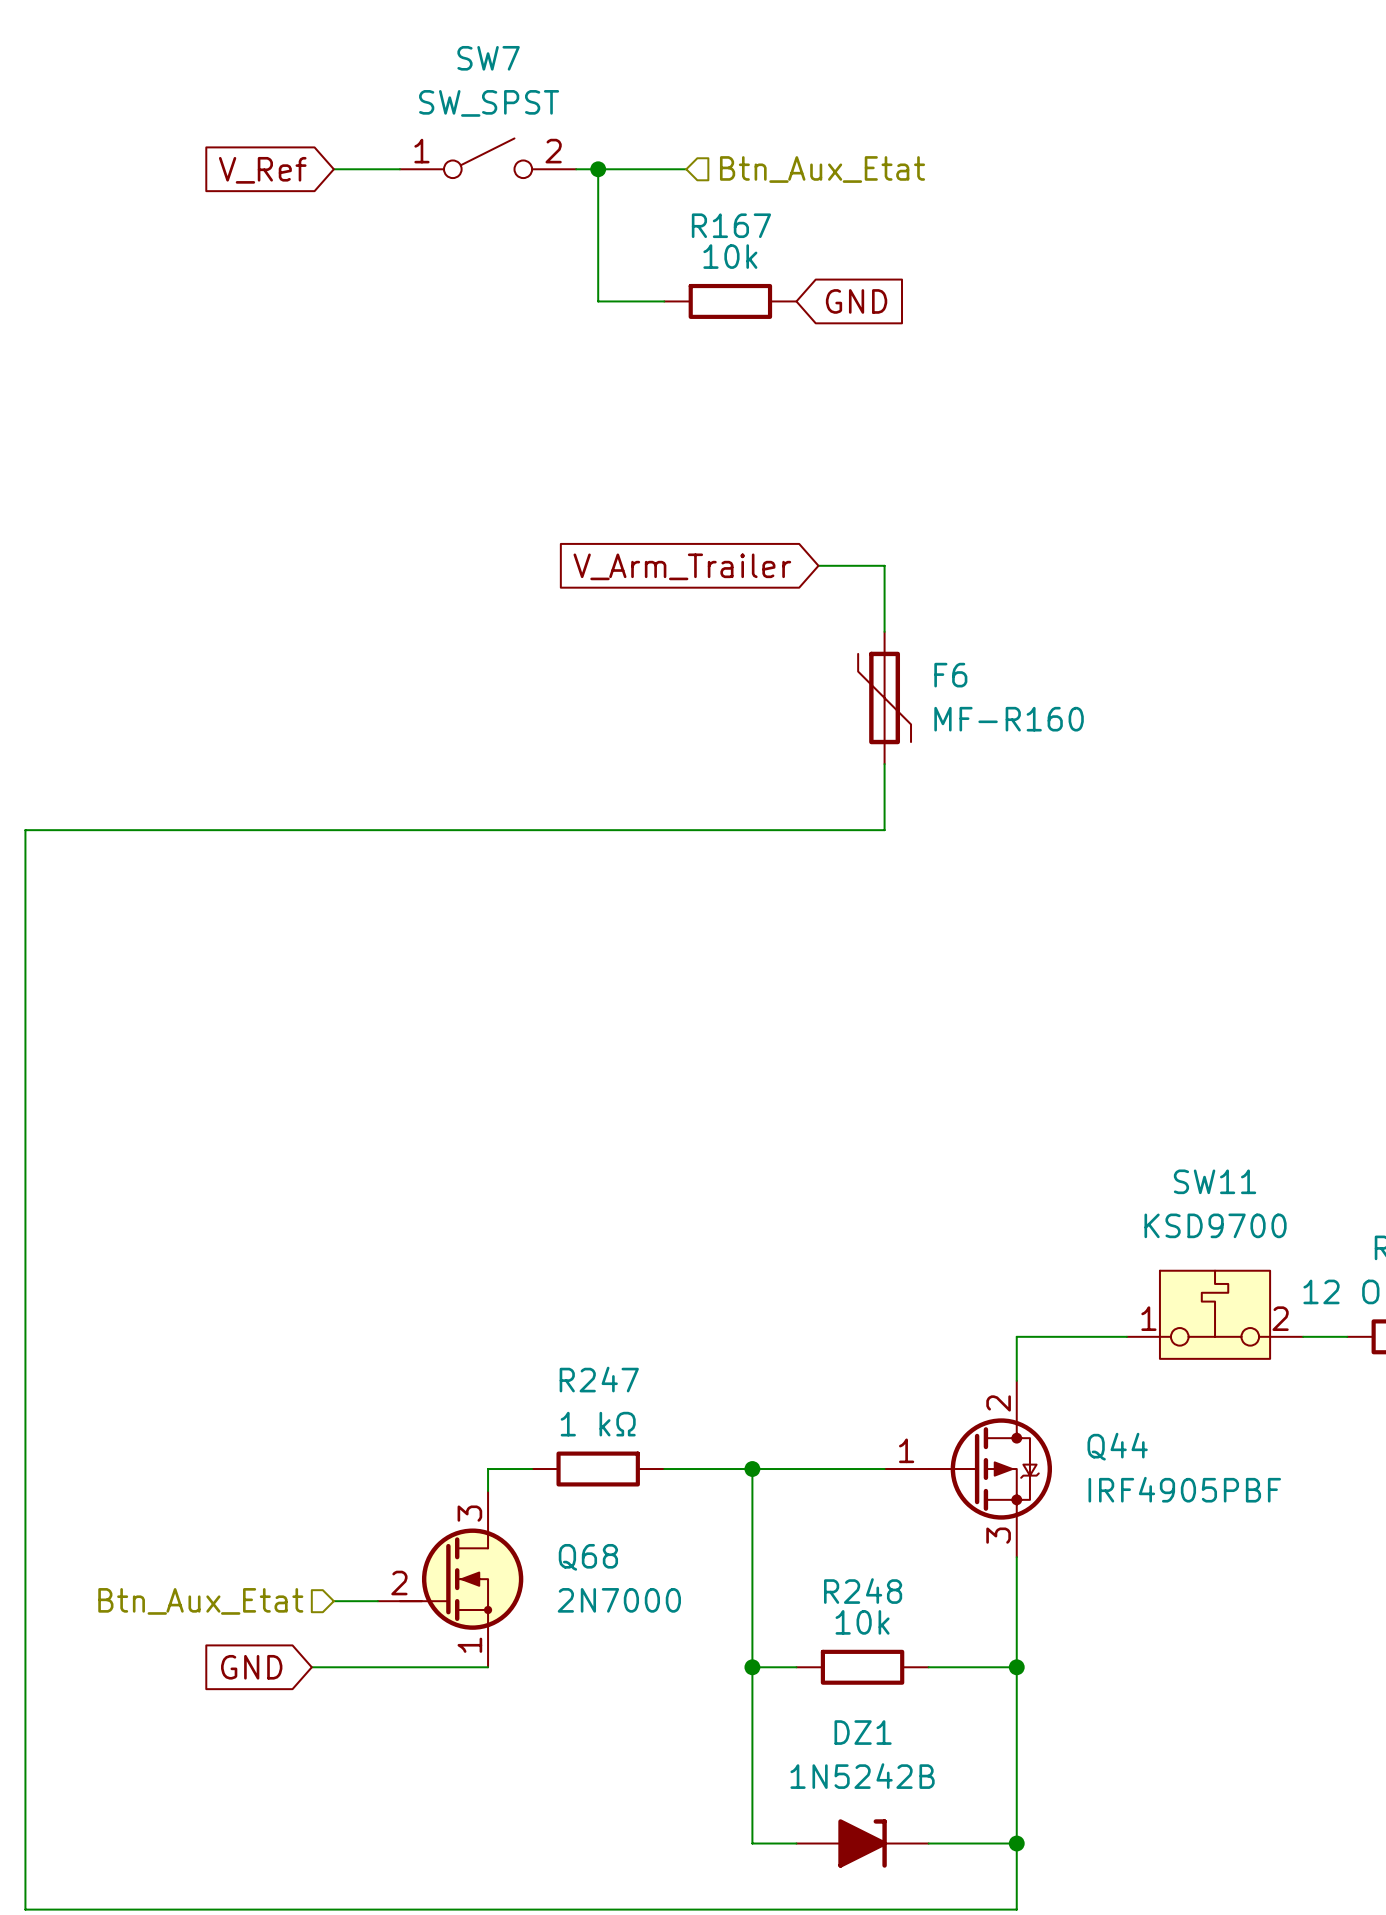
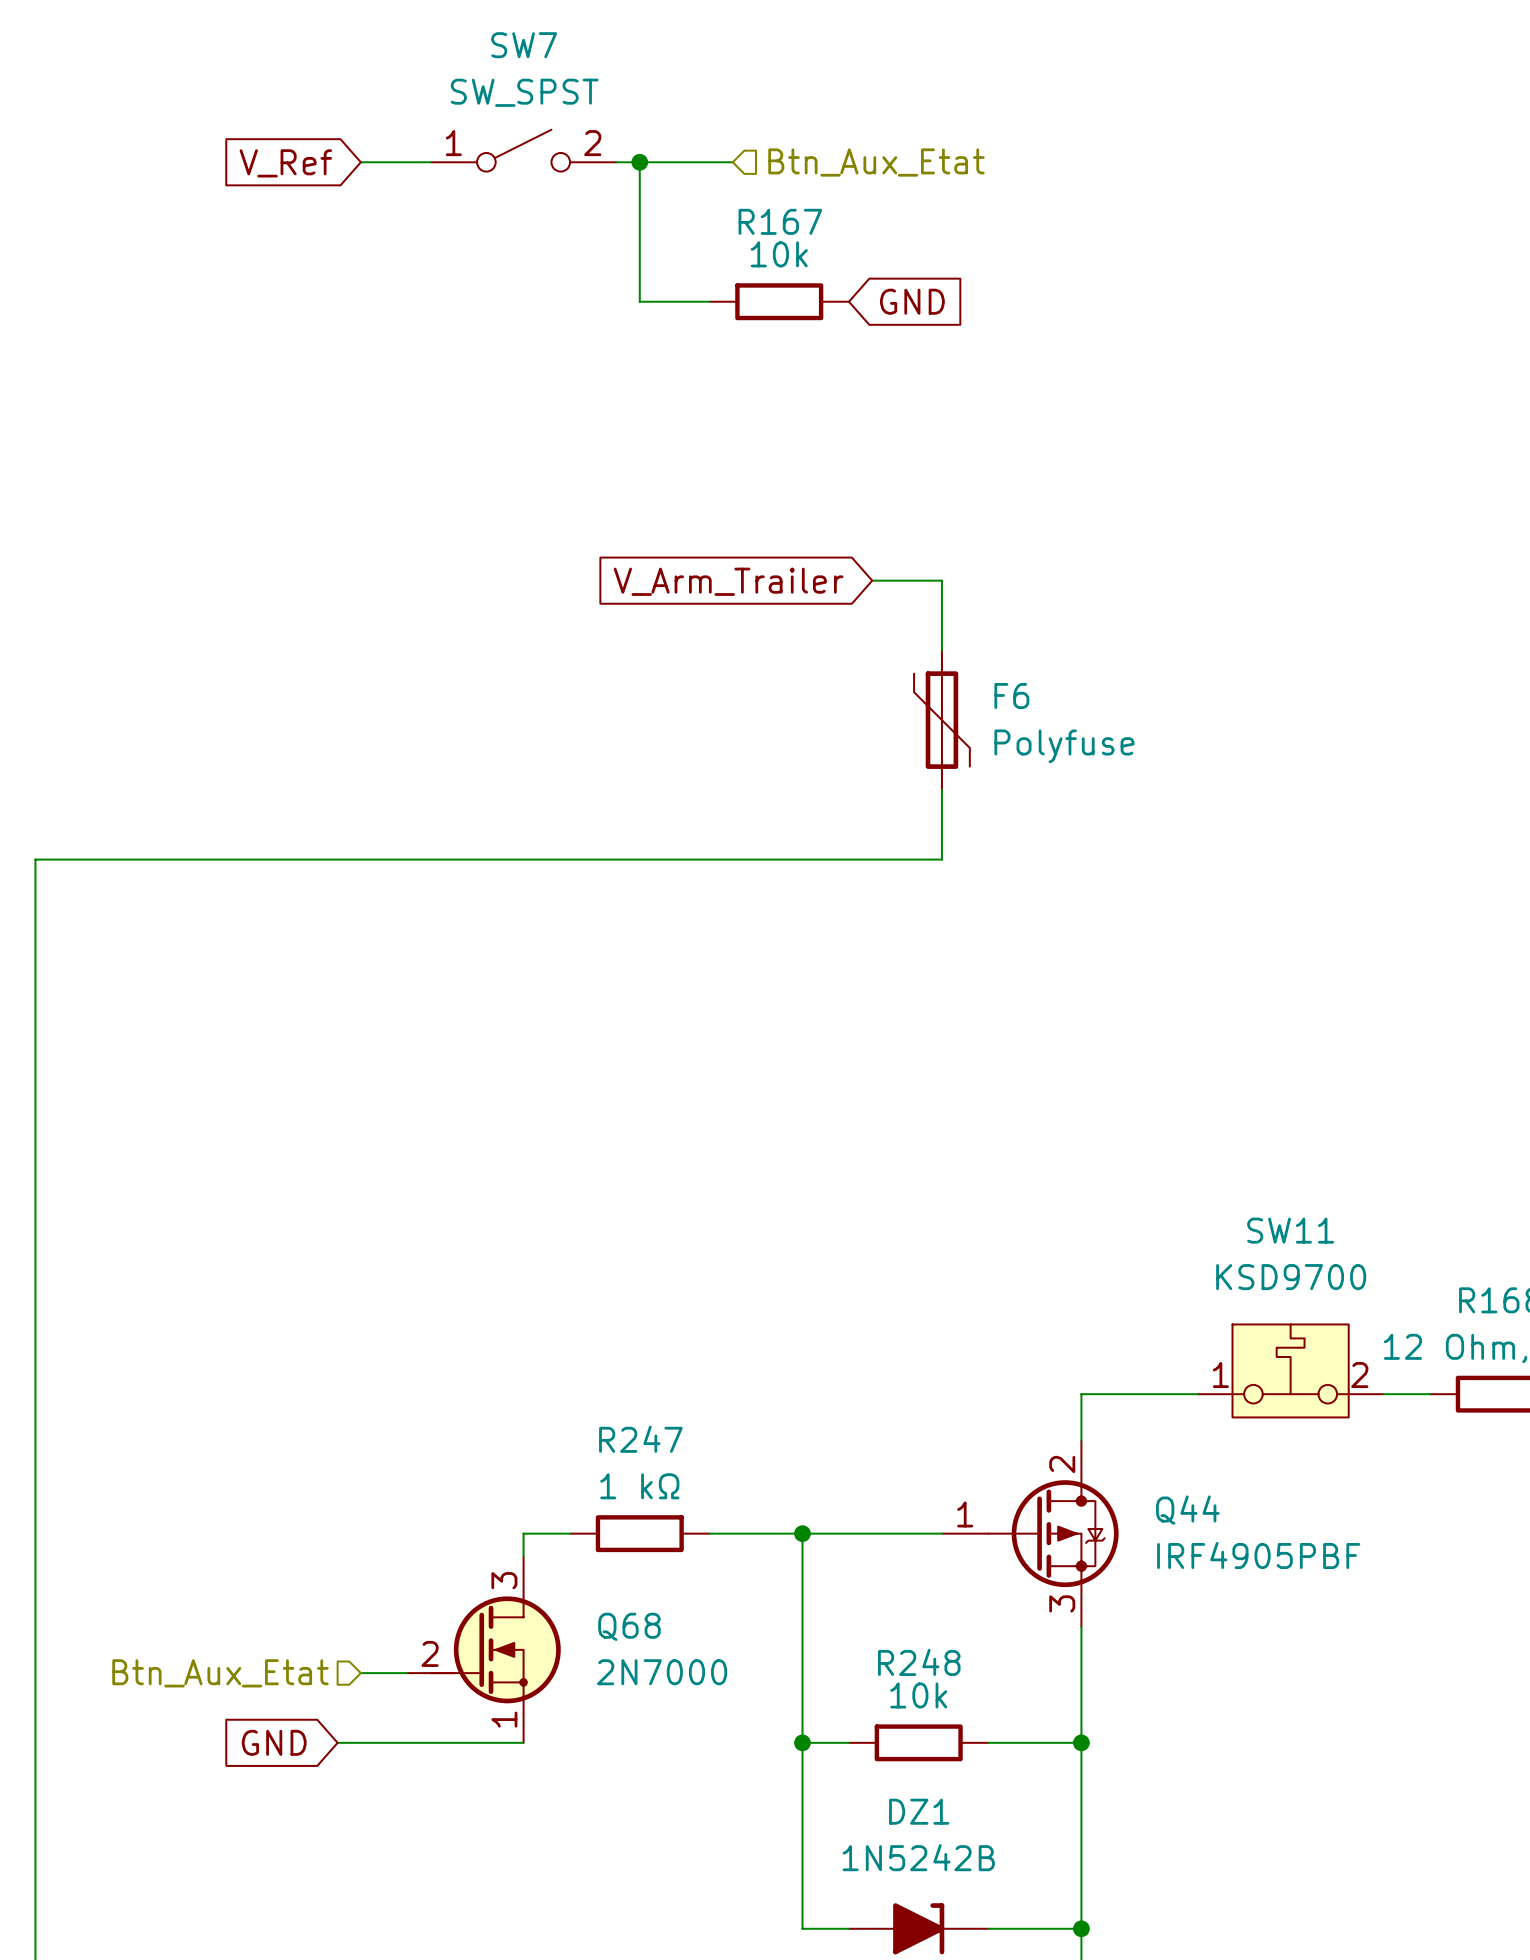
F6 value: MF-R160 (1009, 719) -> Polyfuse (1064, 746)

